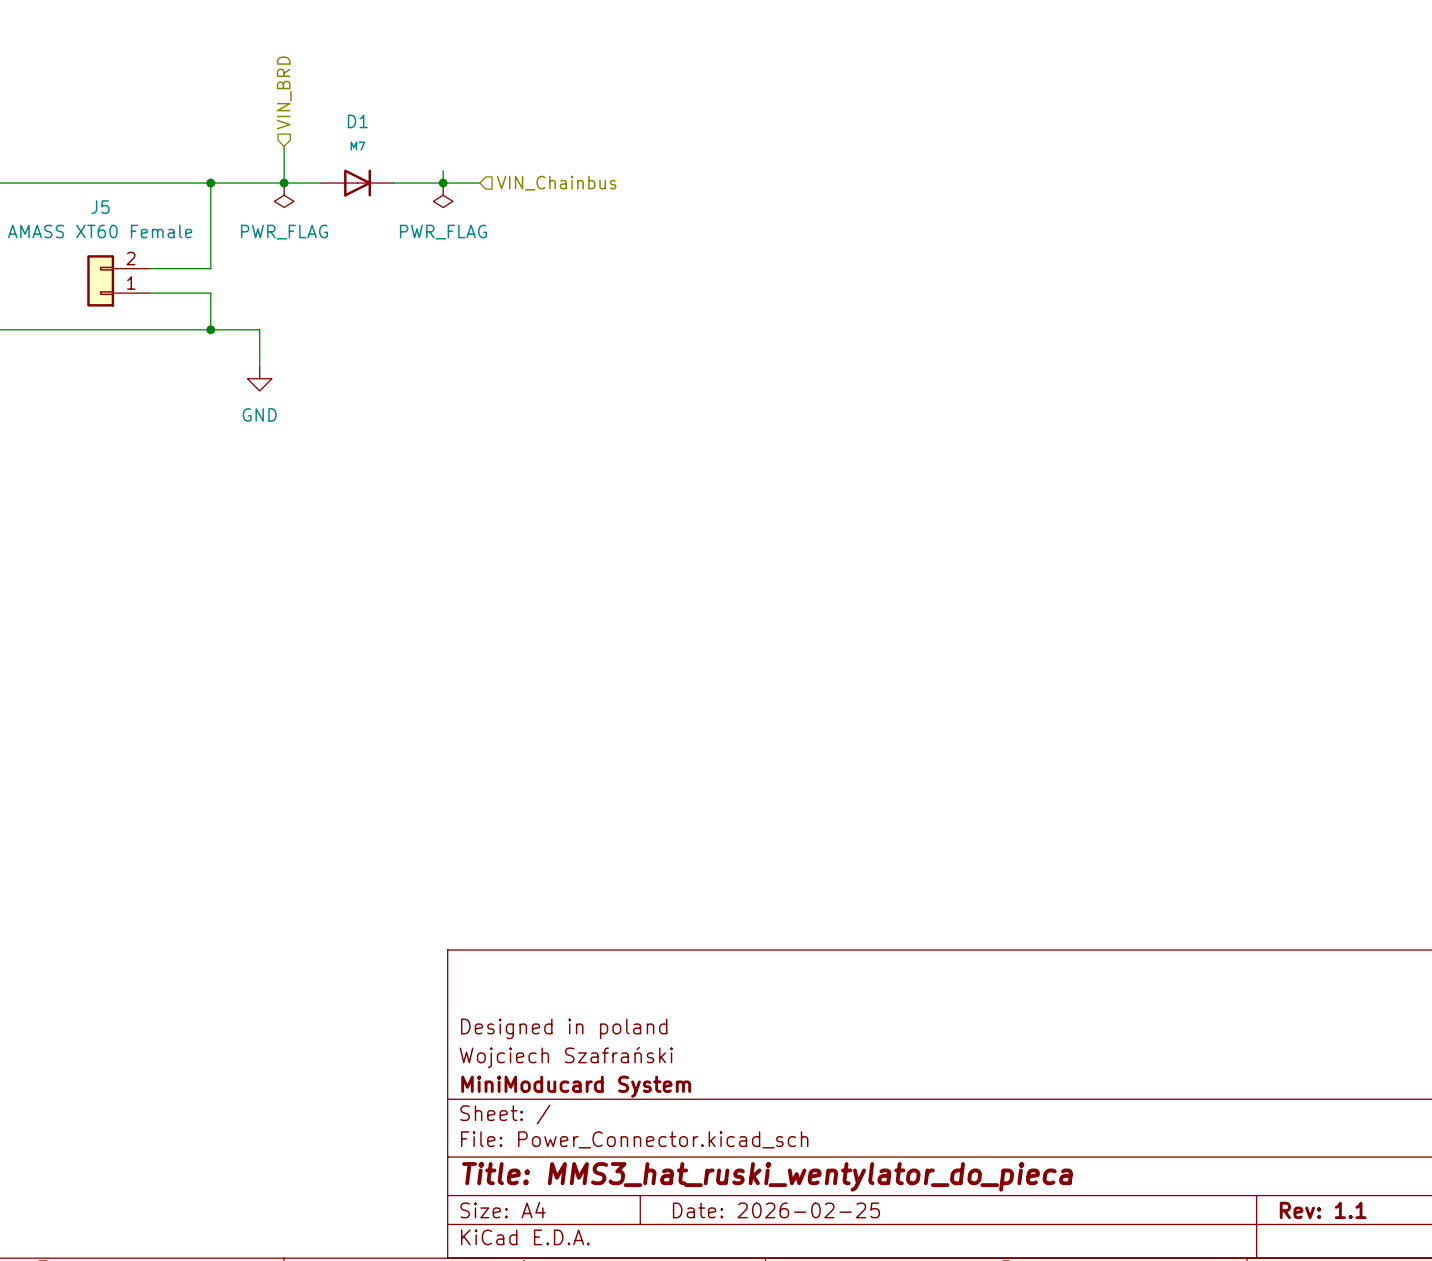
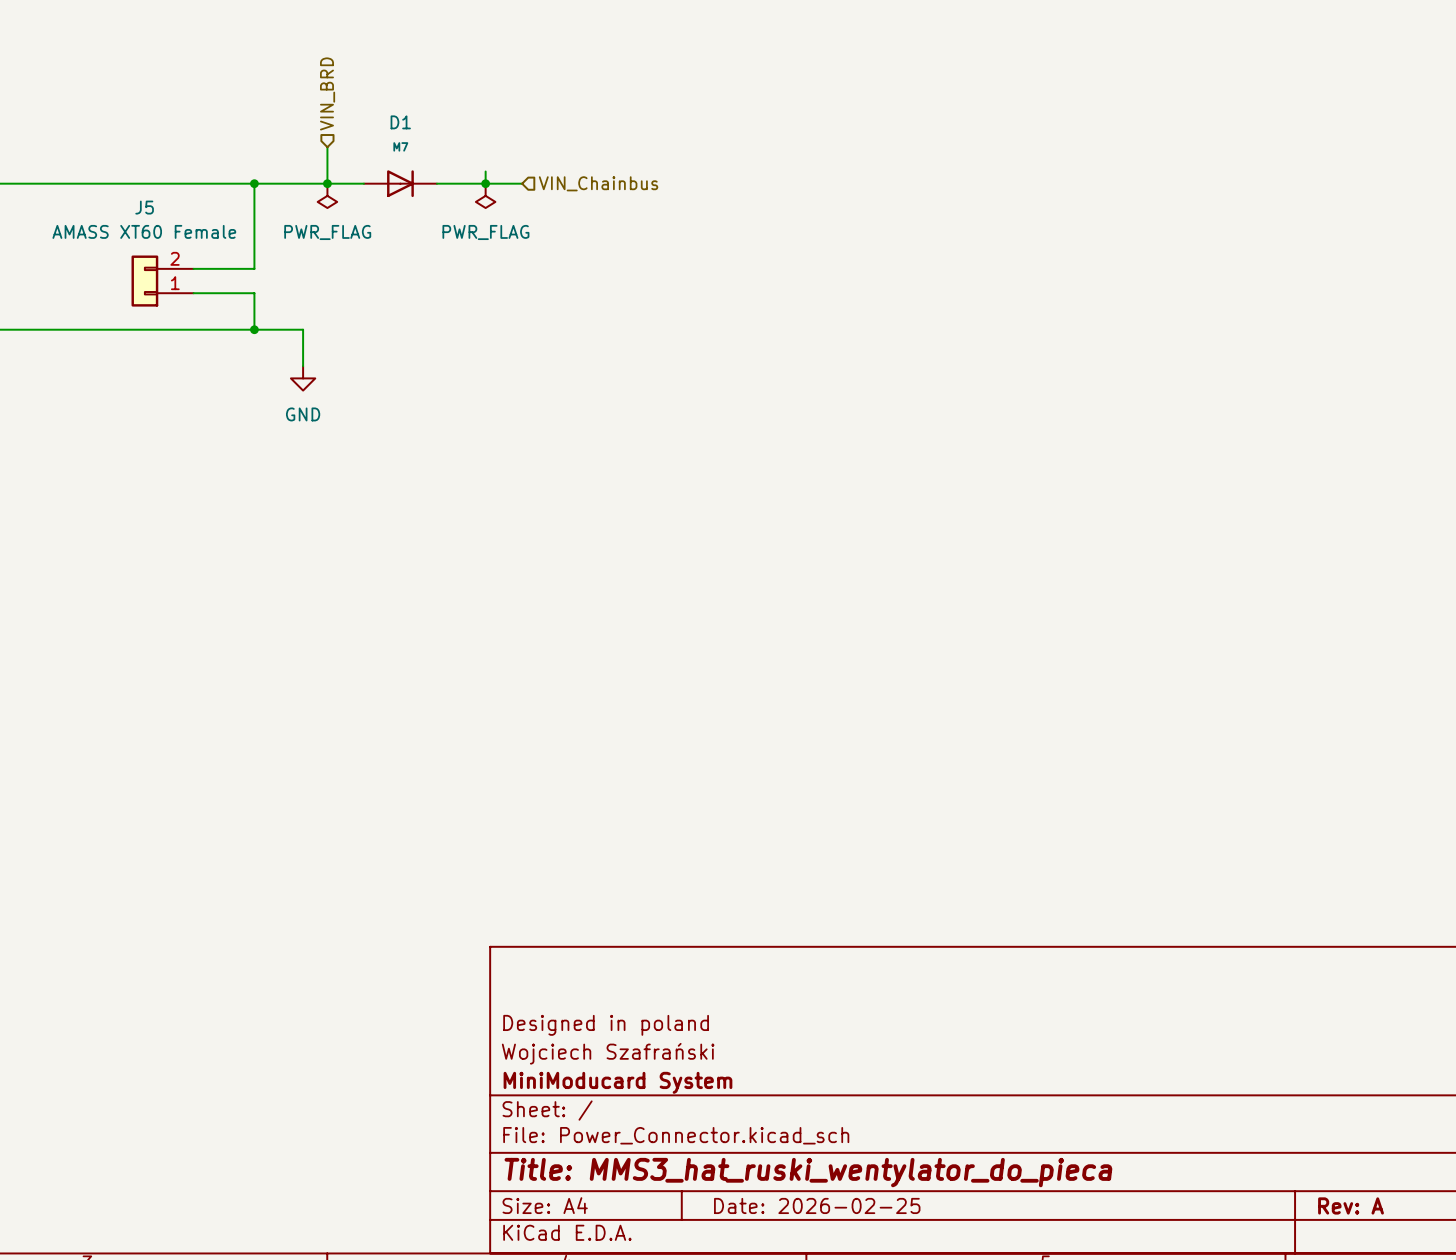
title block: Rev: 1.1 (1323, 1210) -> Rev: A (1351, 1205)

